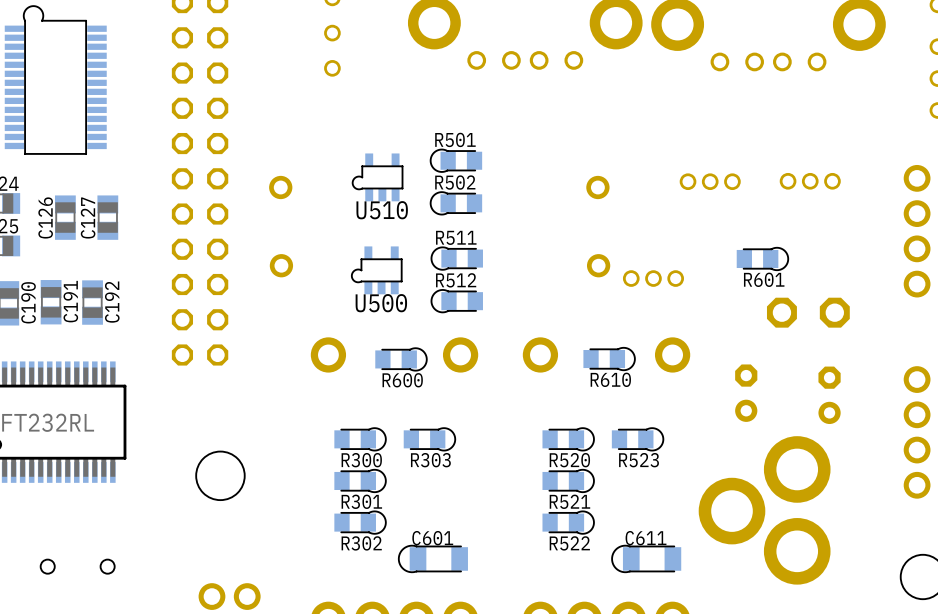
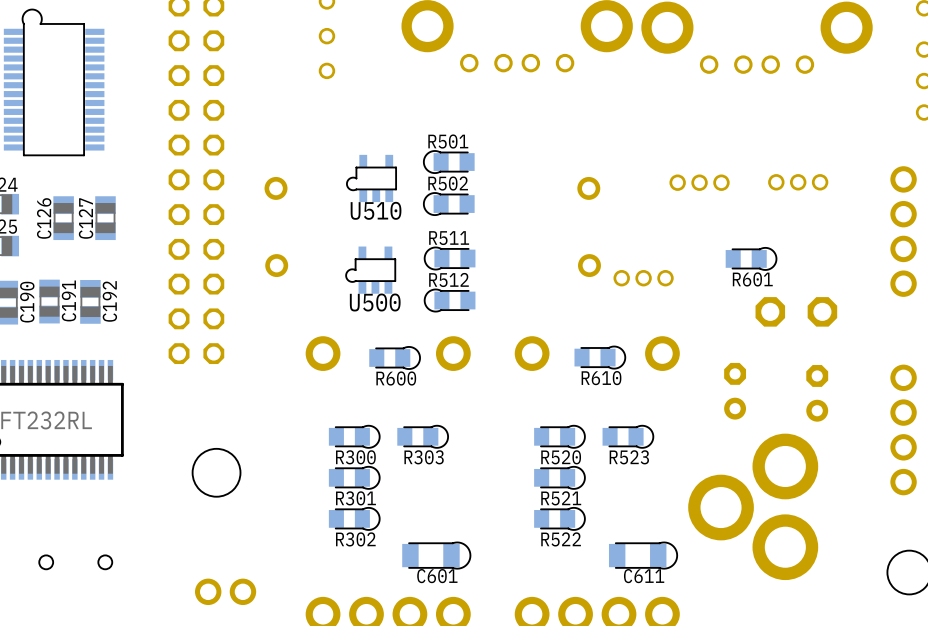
C601 rotation: 0° (433, 558) -> 180° (436, 555)
C611 rotation: 0° (646, 558) -> 180° (643, 555)

